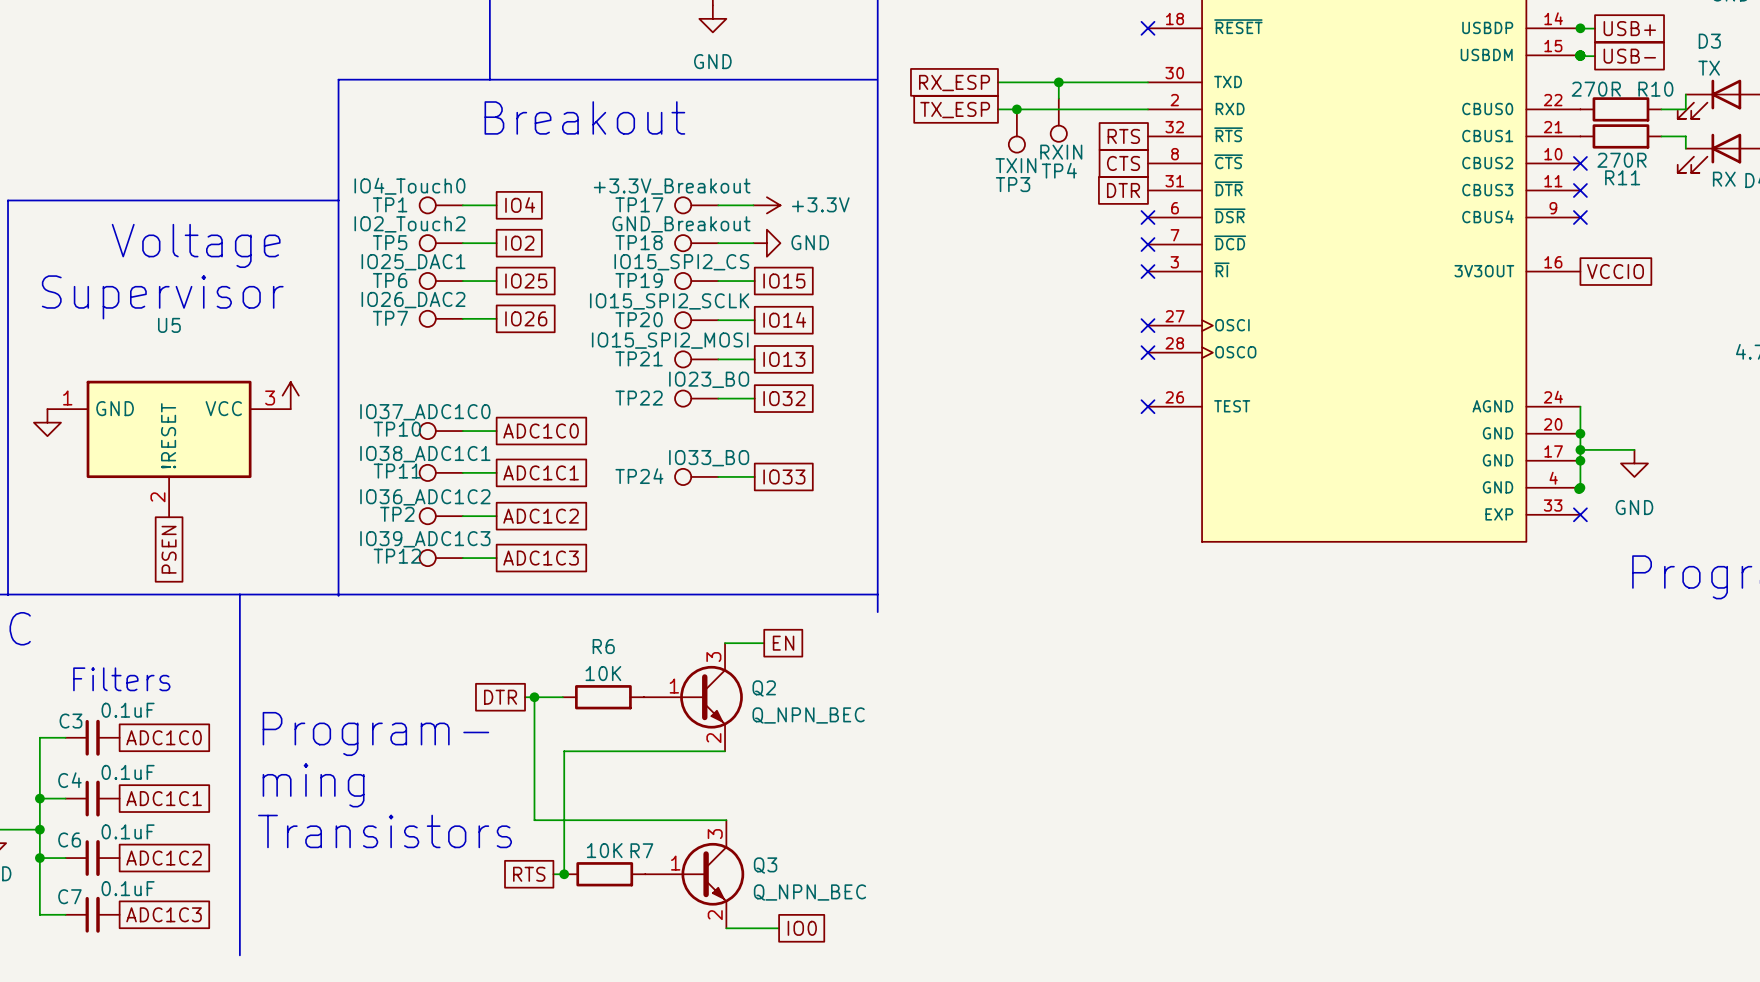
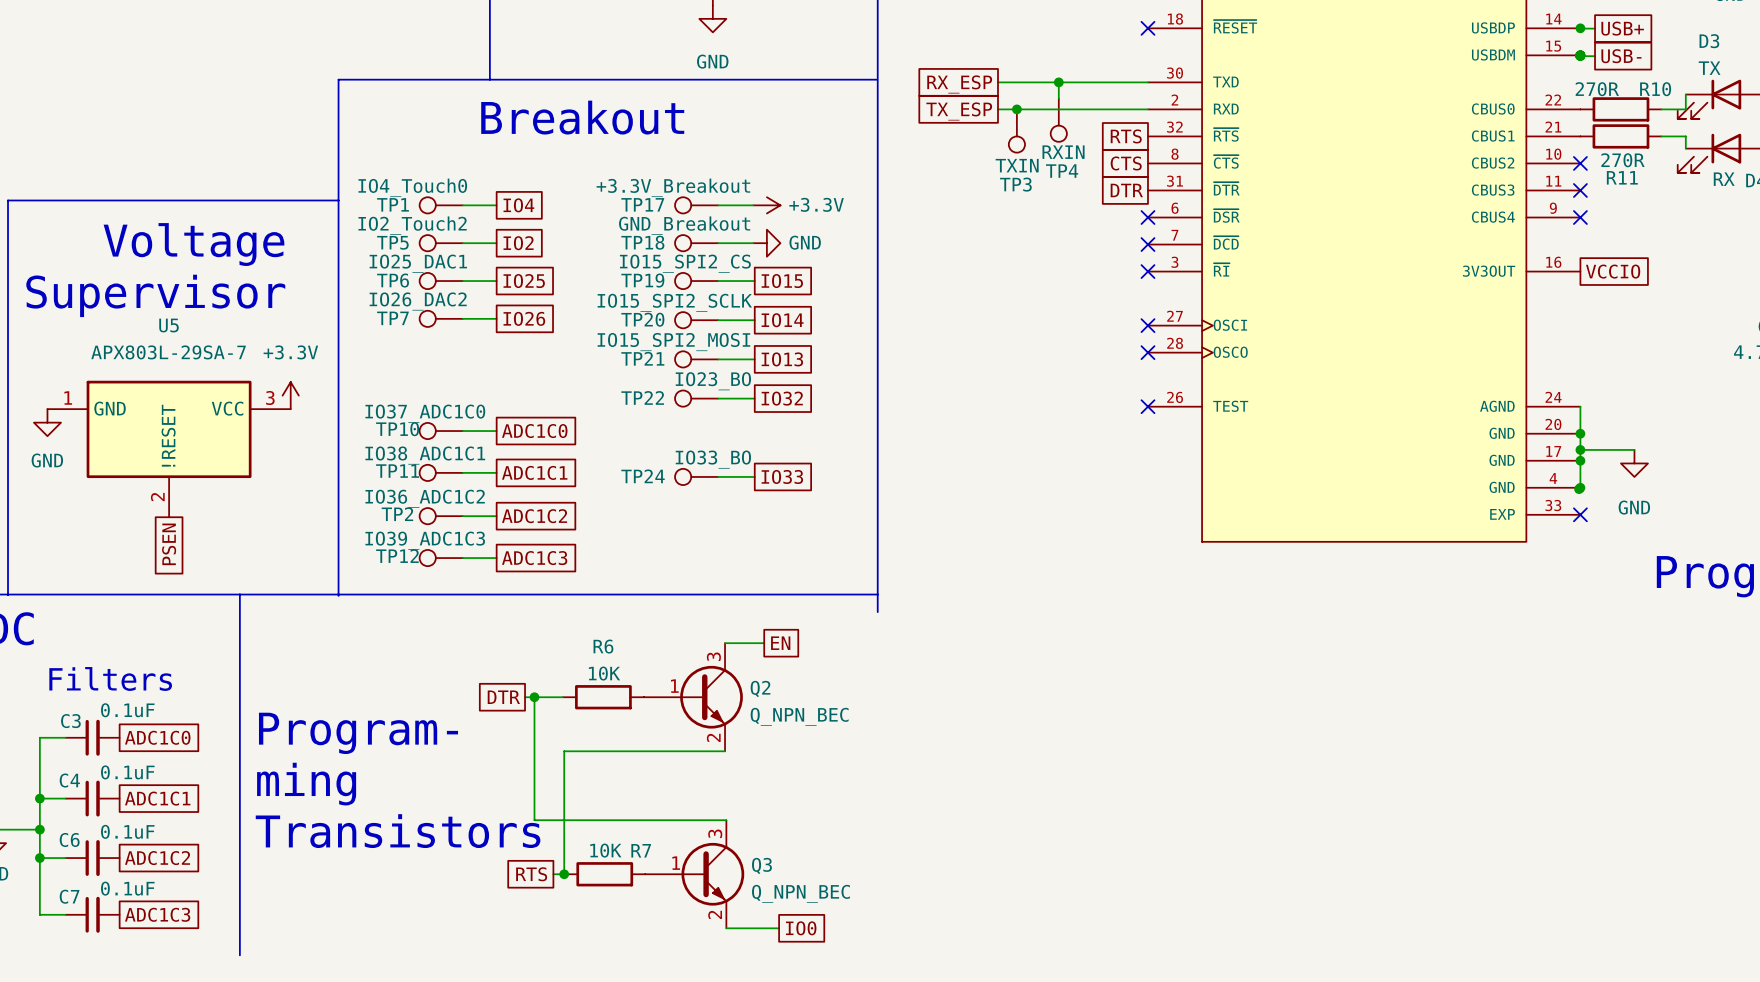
U5 value: none -> APX803L-29SA-7 (168, 352)
power symbol text: none -> +3.3V (290, 352)
power symbol text: none -> GND (47, 460)

